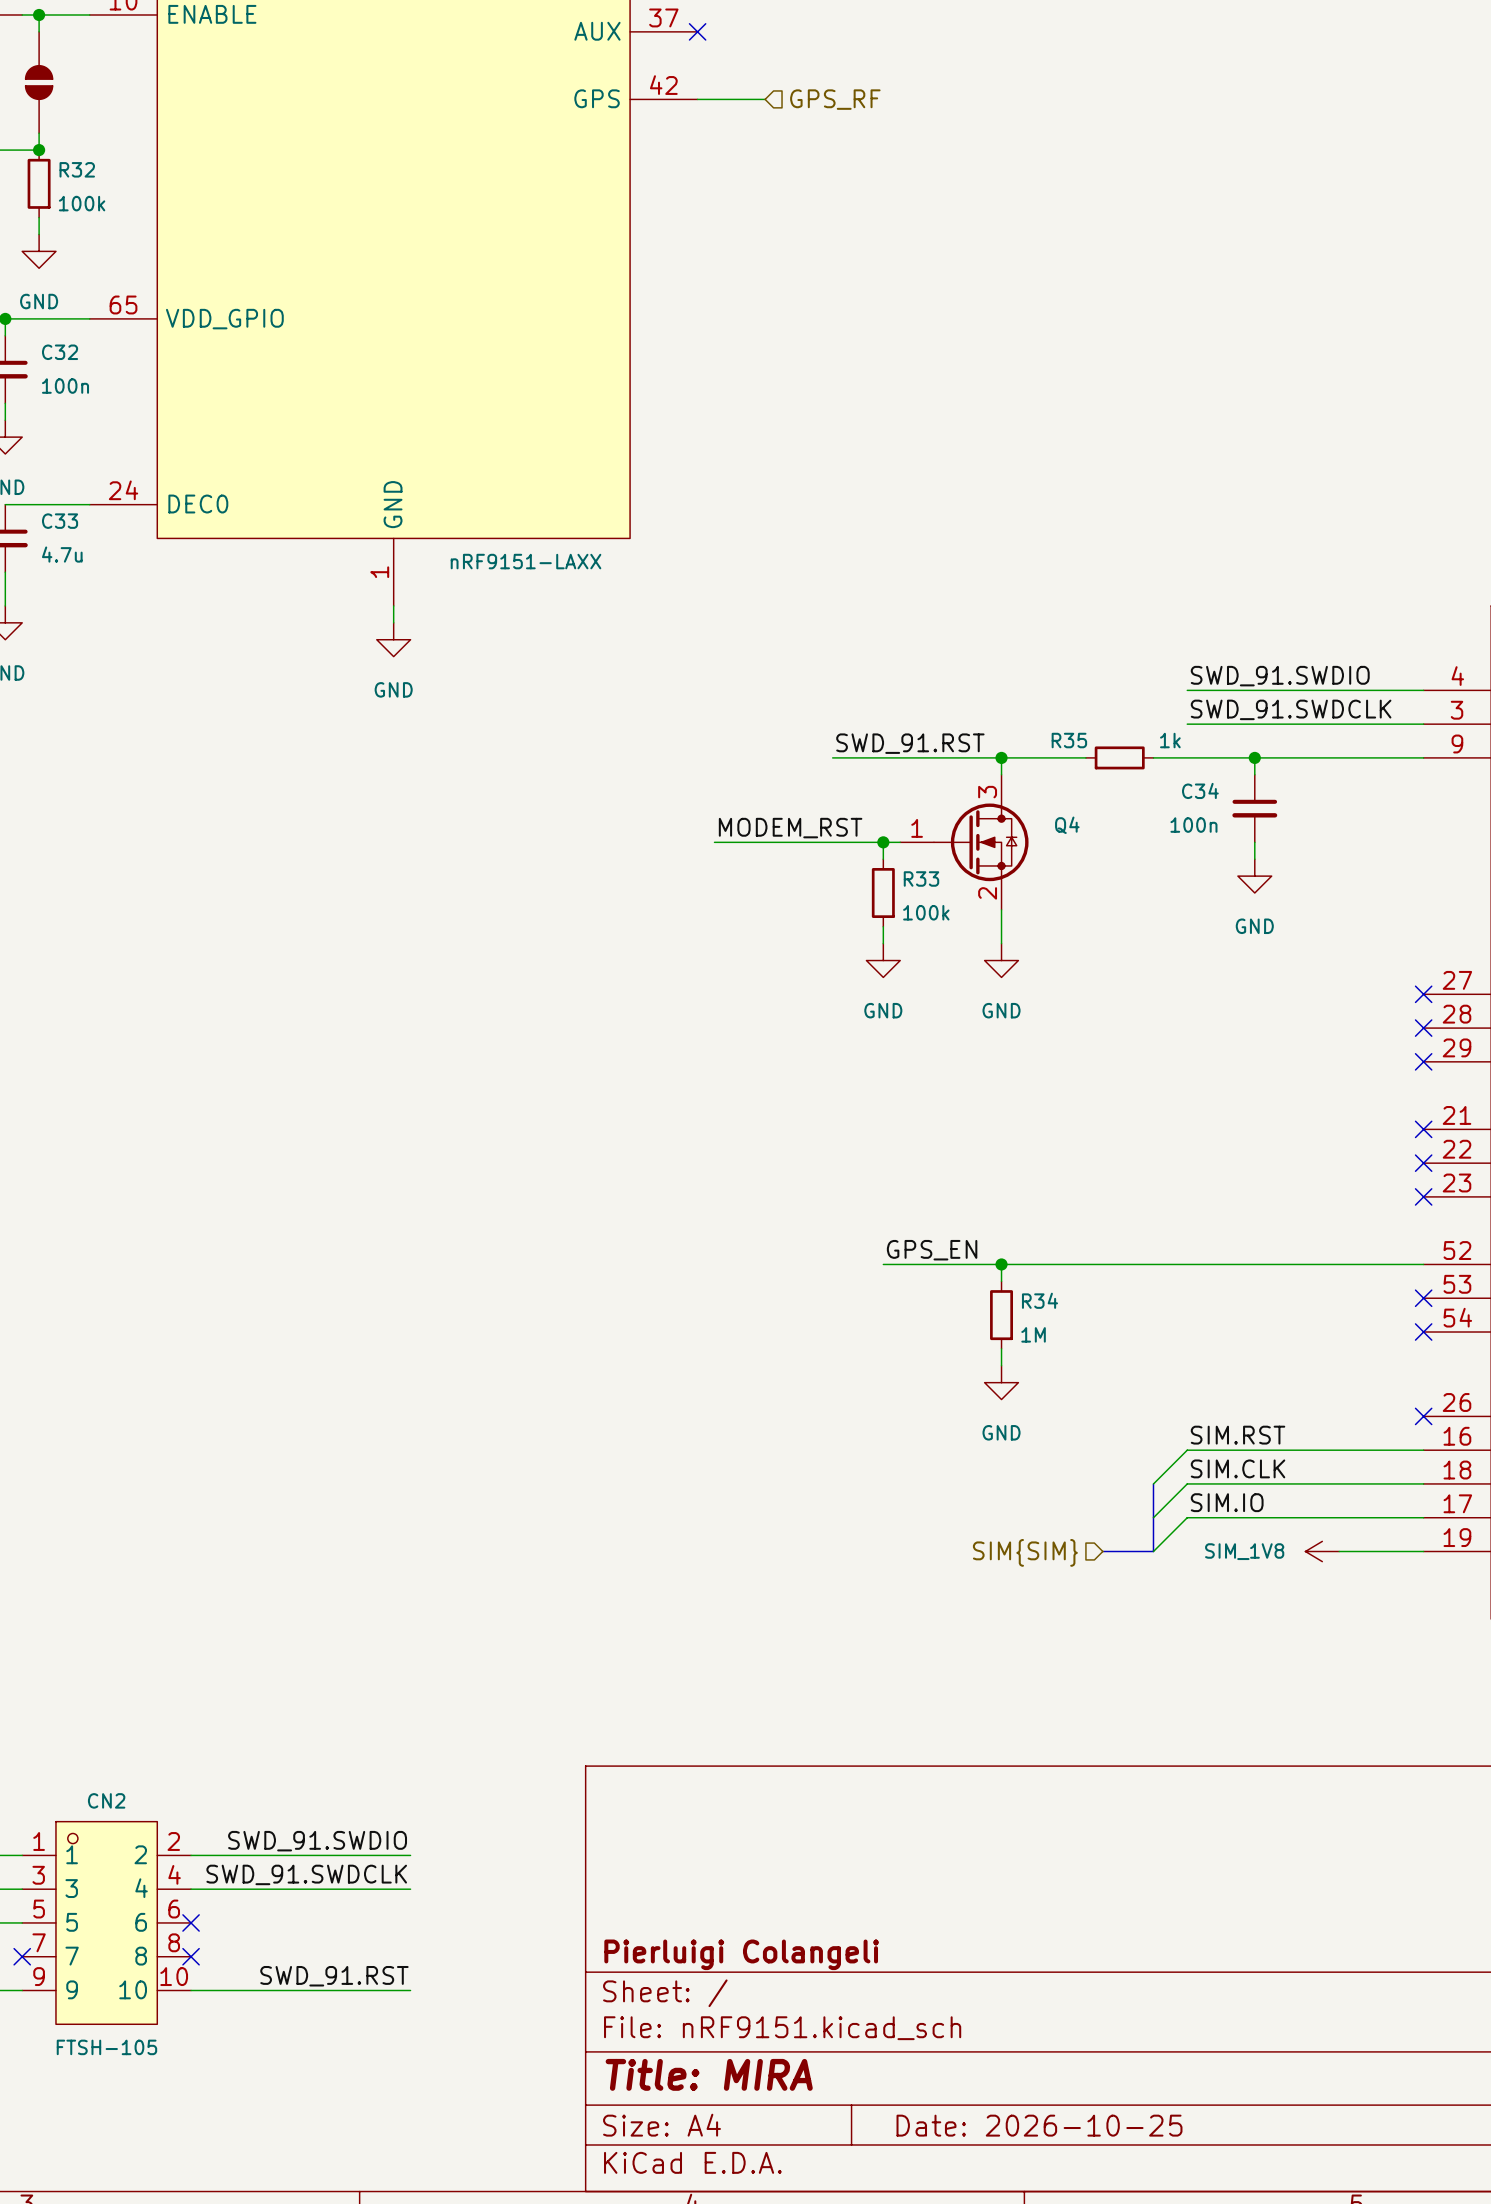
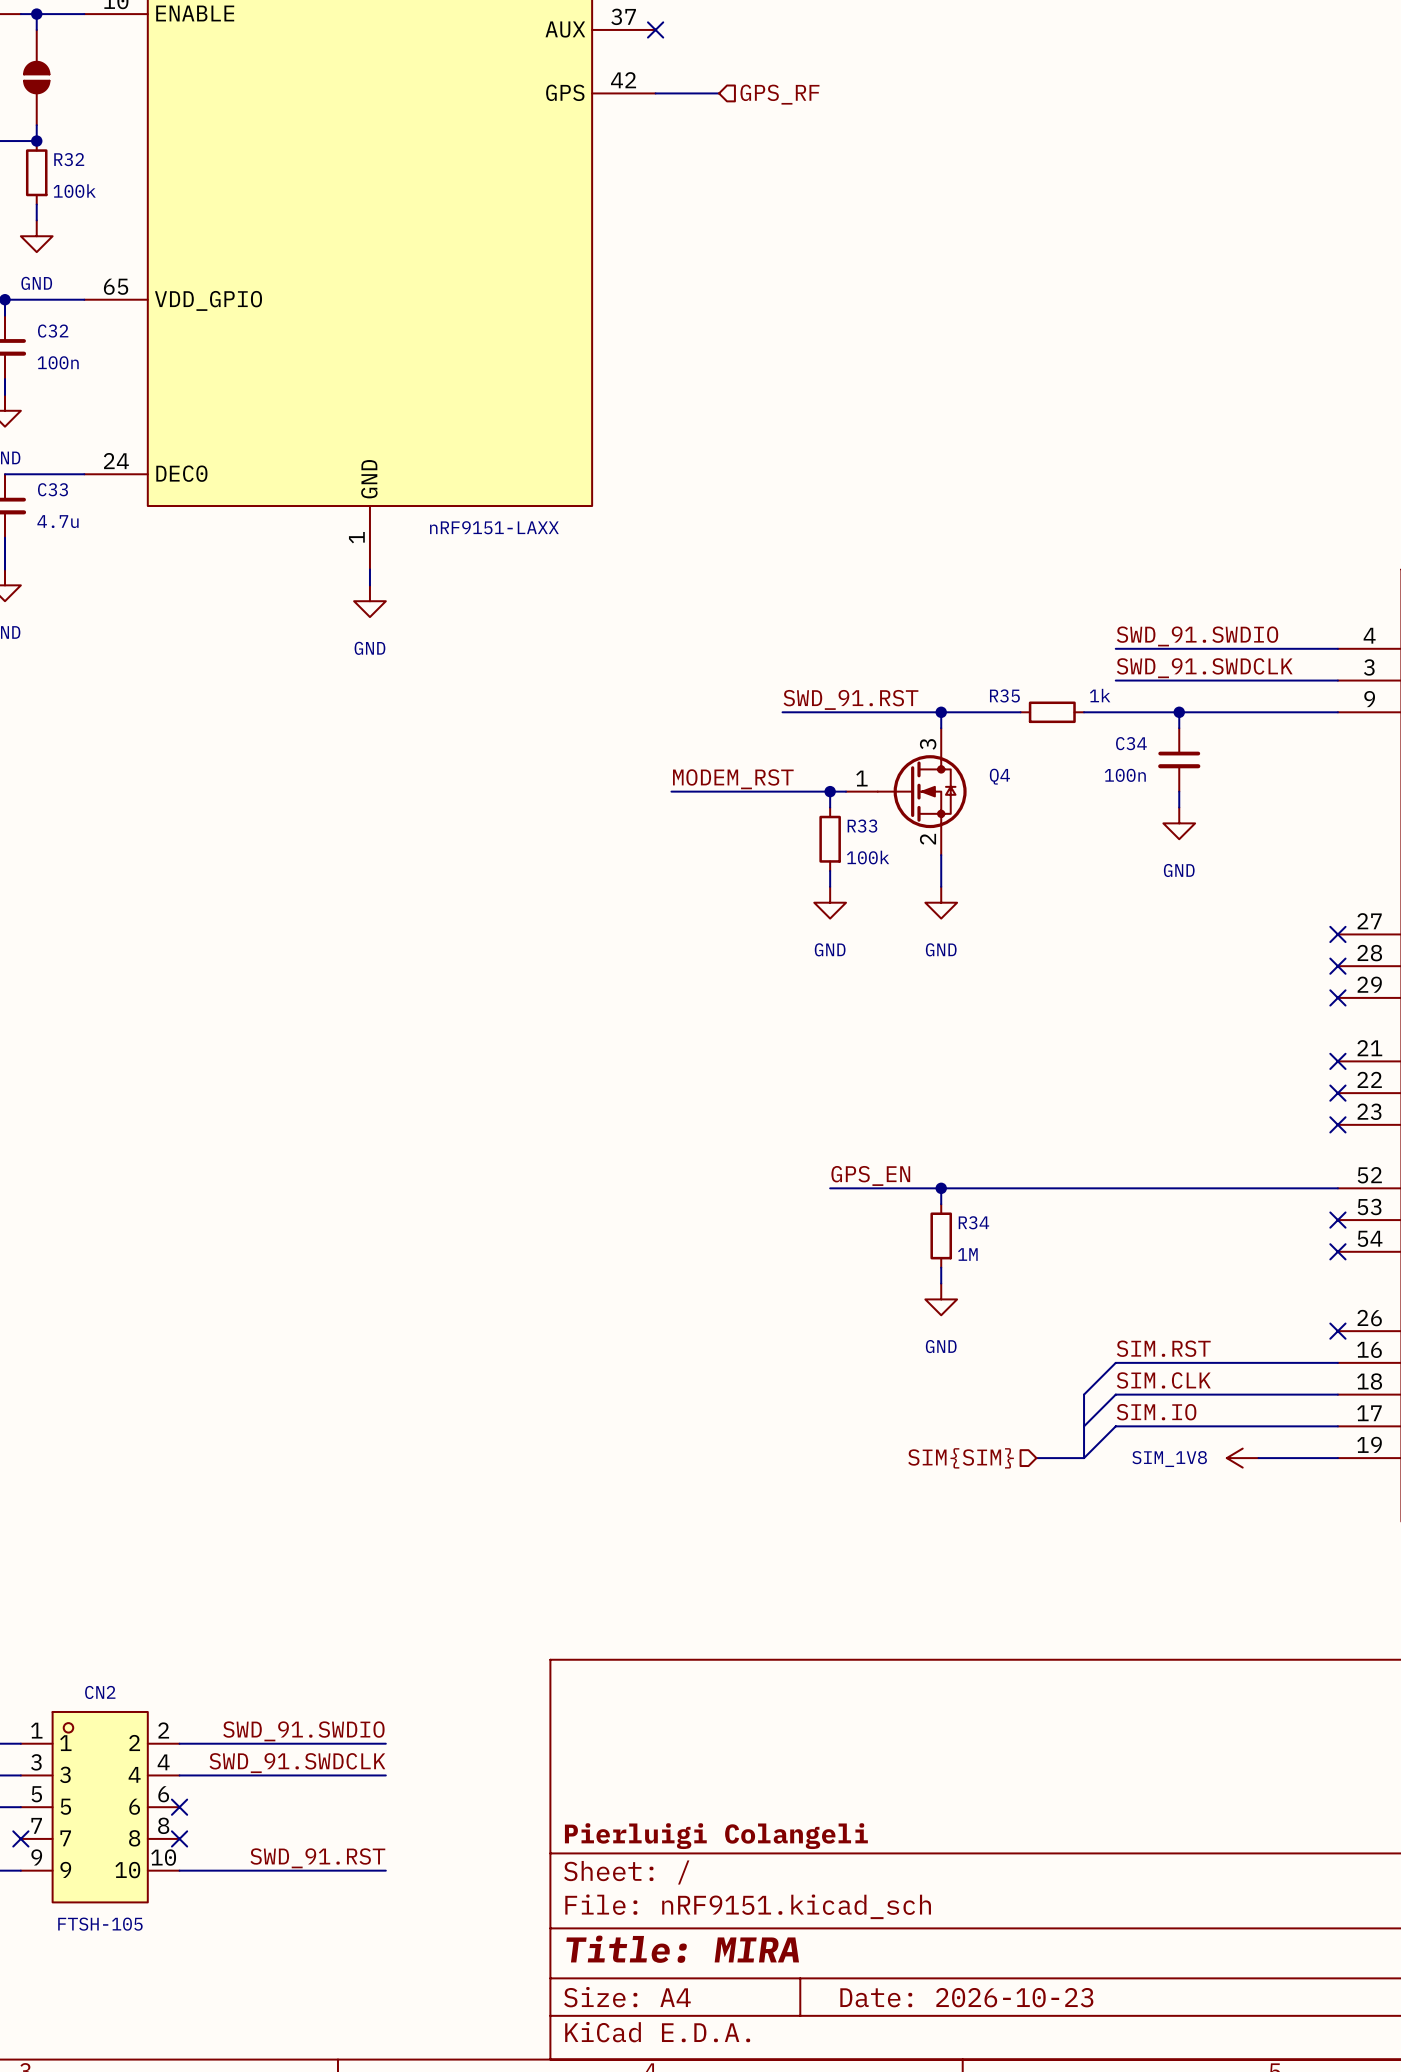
title block: Date: 2026-10-25 (1039, 2125) -> Date: 2026-10-23 (966, 1997)

